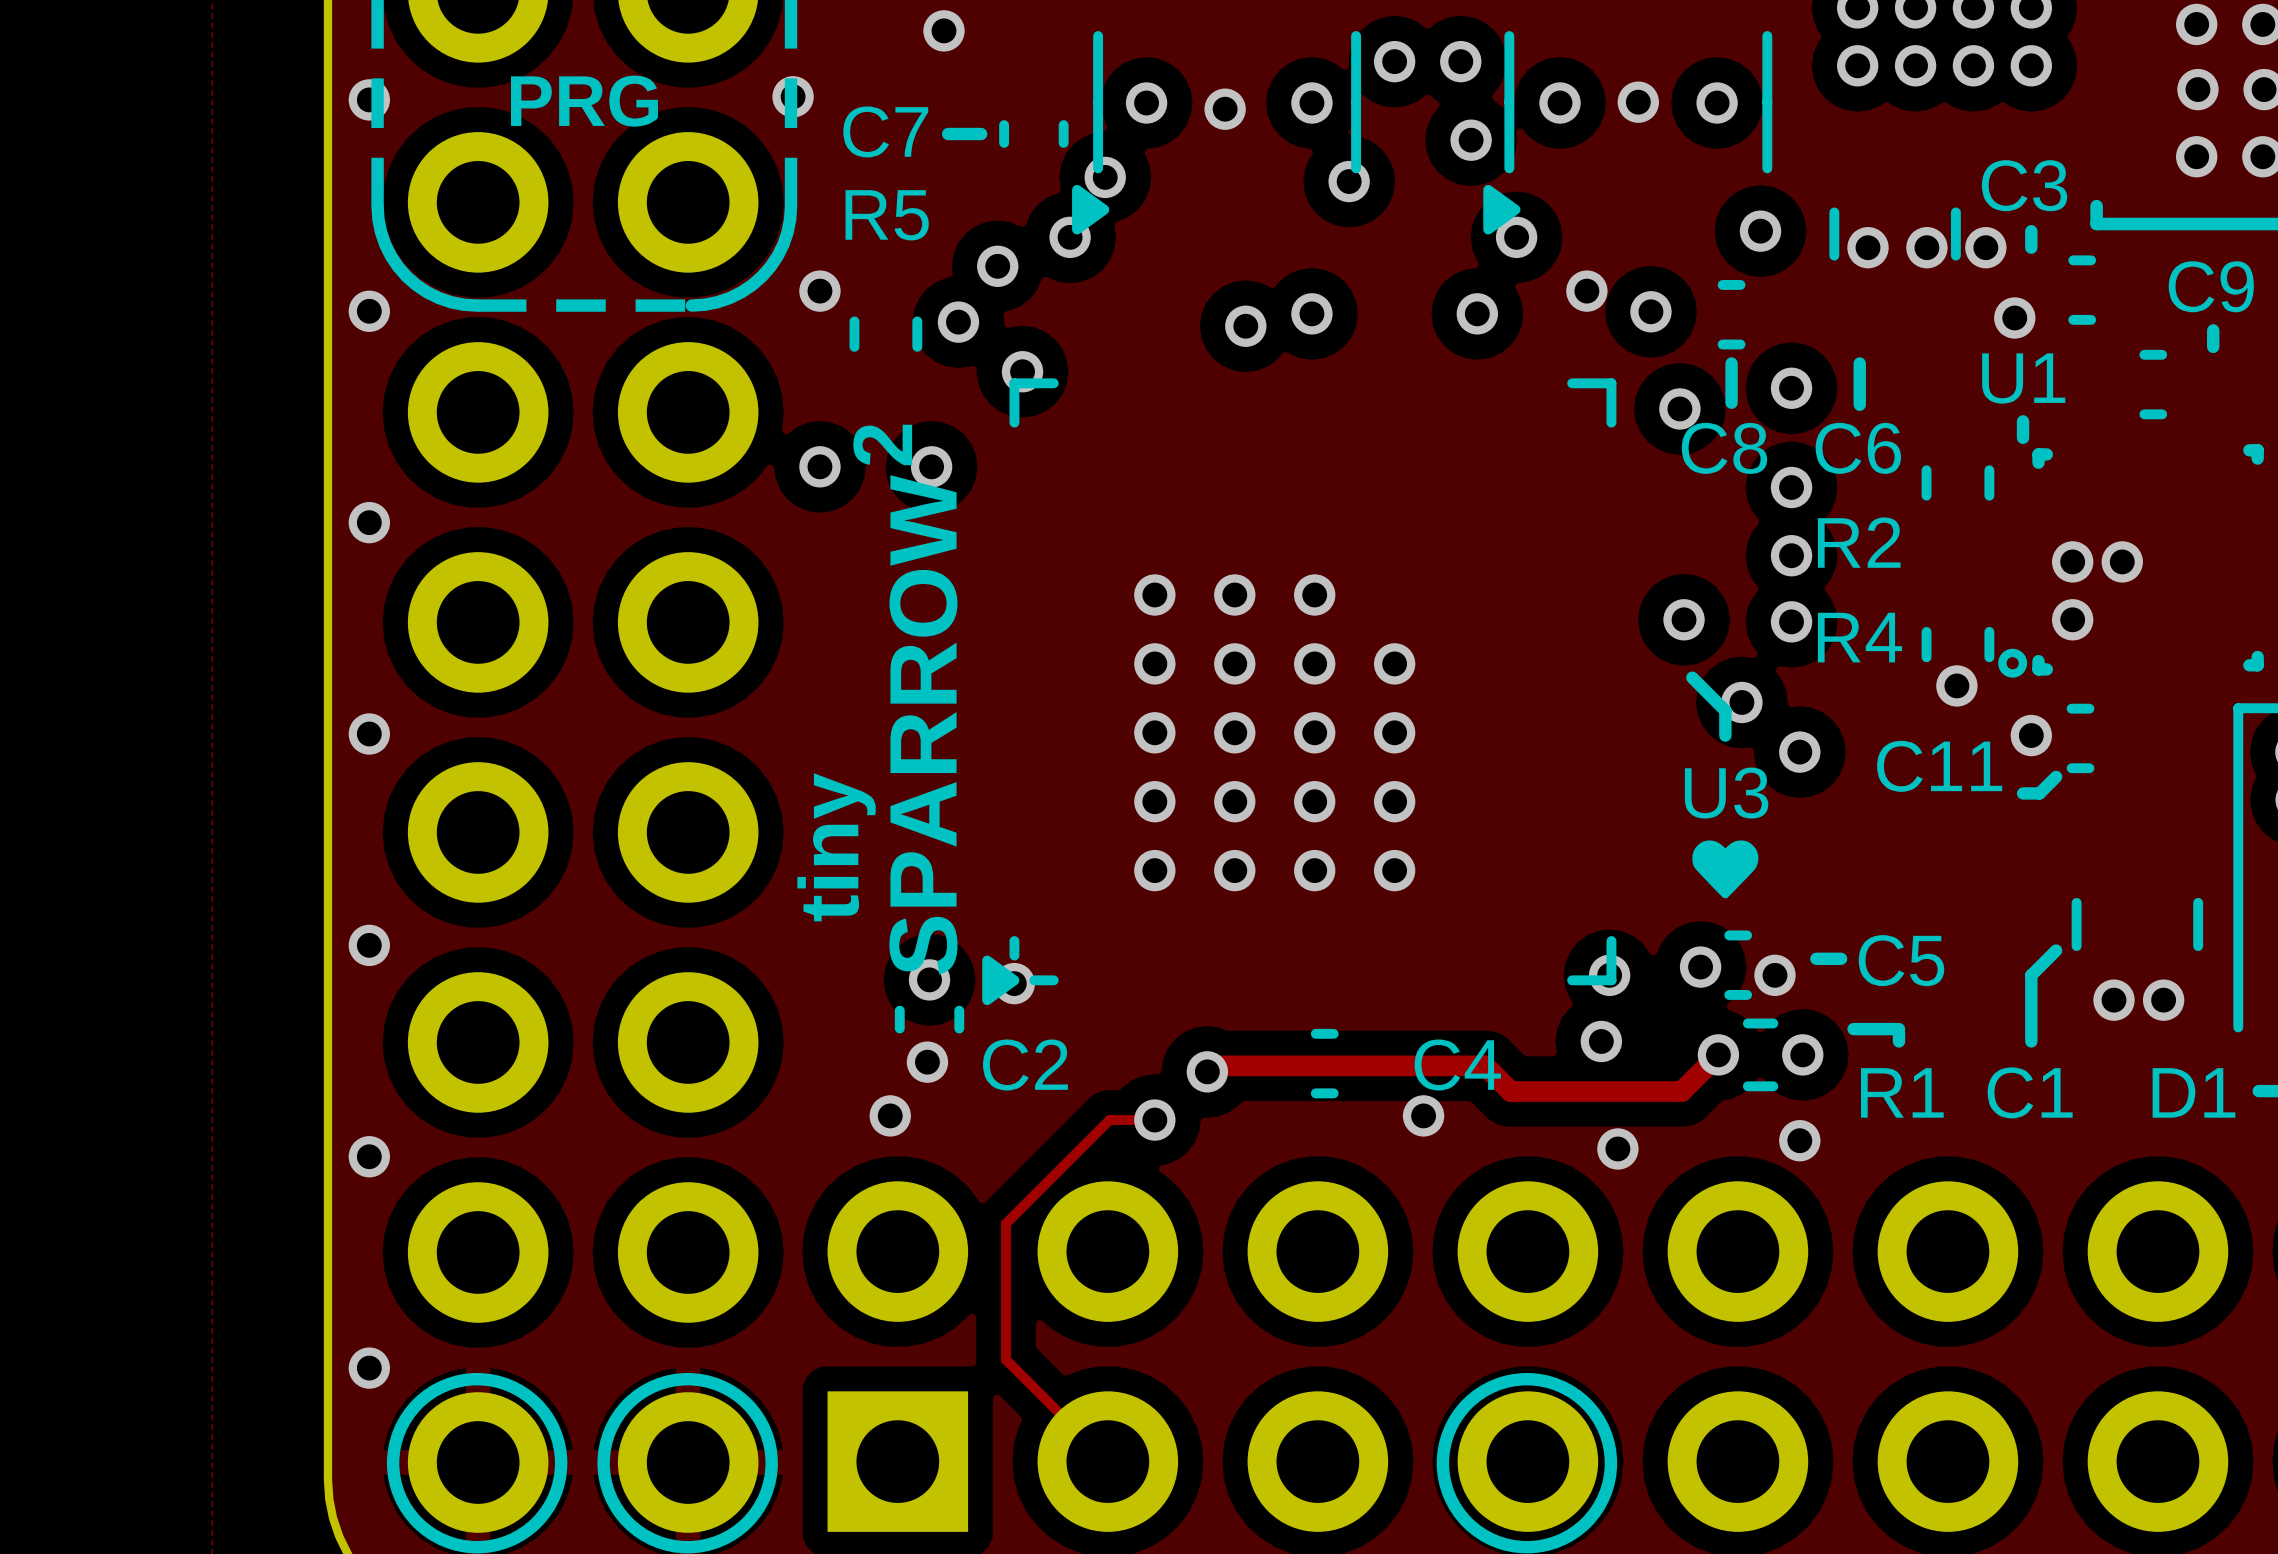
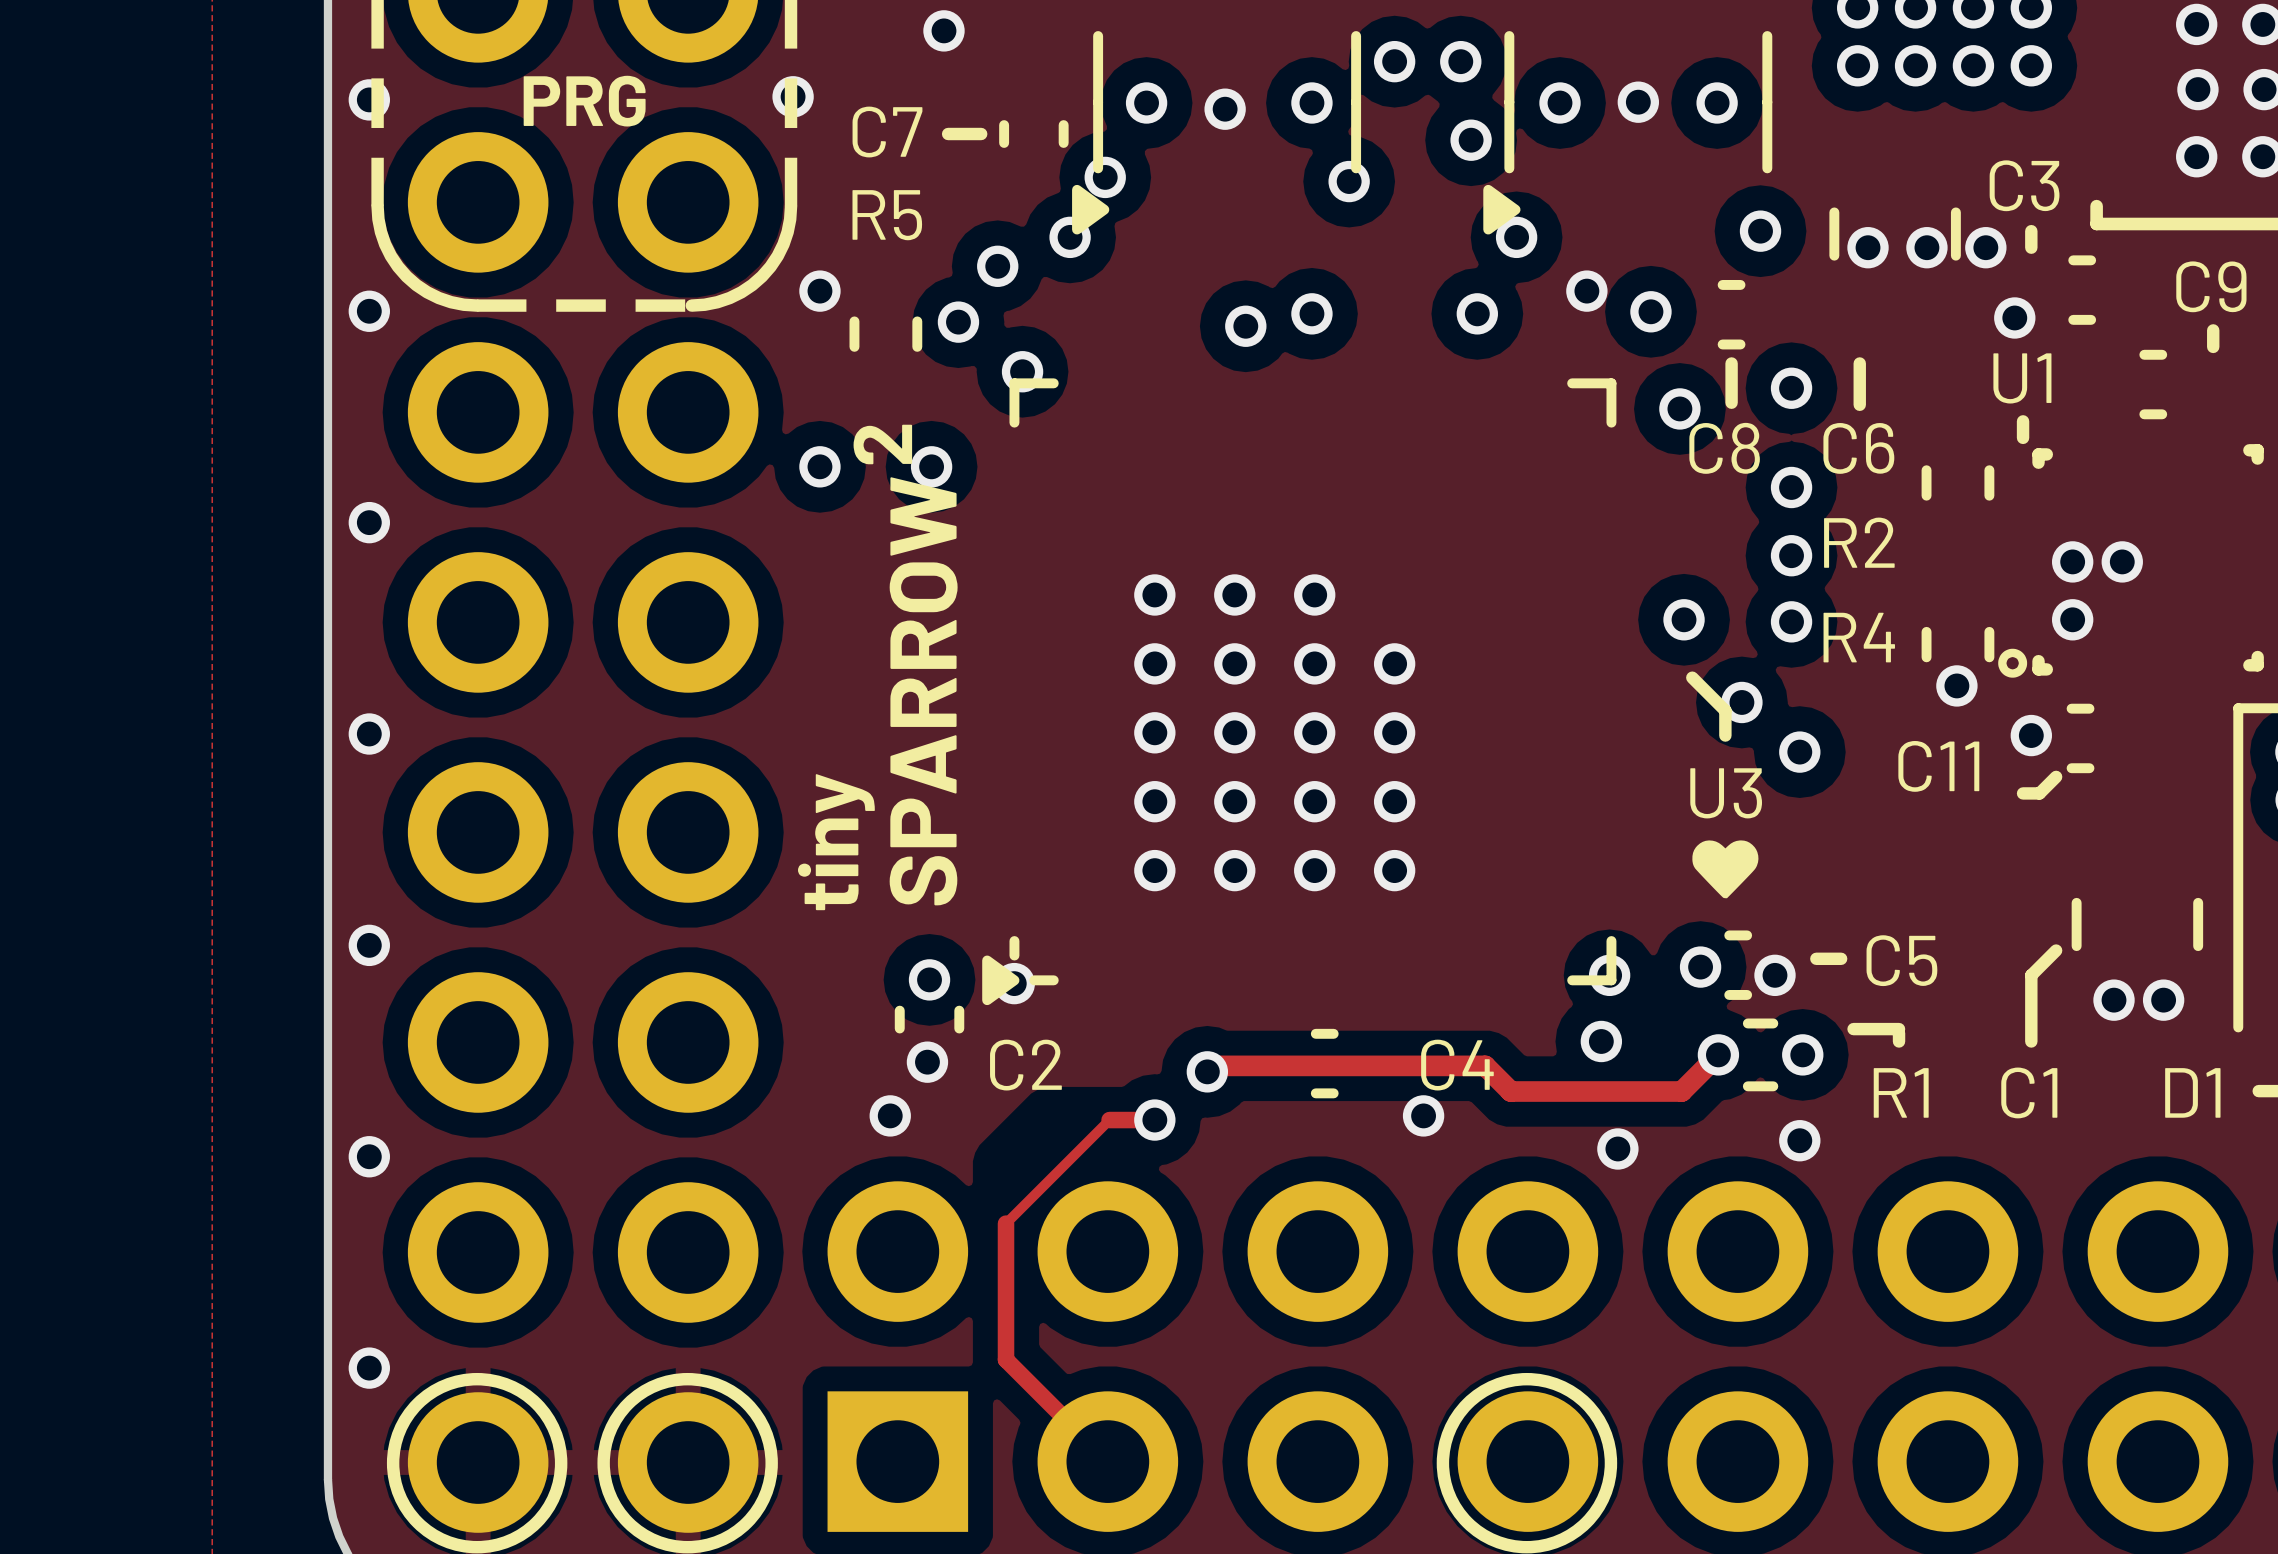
track width: thin (1109, 1120) (1154, 1120) -> thick (1109, 1120) (1154, 1120)
track width: thin (1006, 1223) (1006, 1359) (1107, 1461) -> thick (1006, 1223) (1006, 1359) (1107, 1461)

